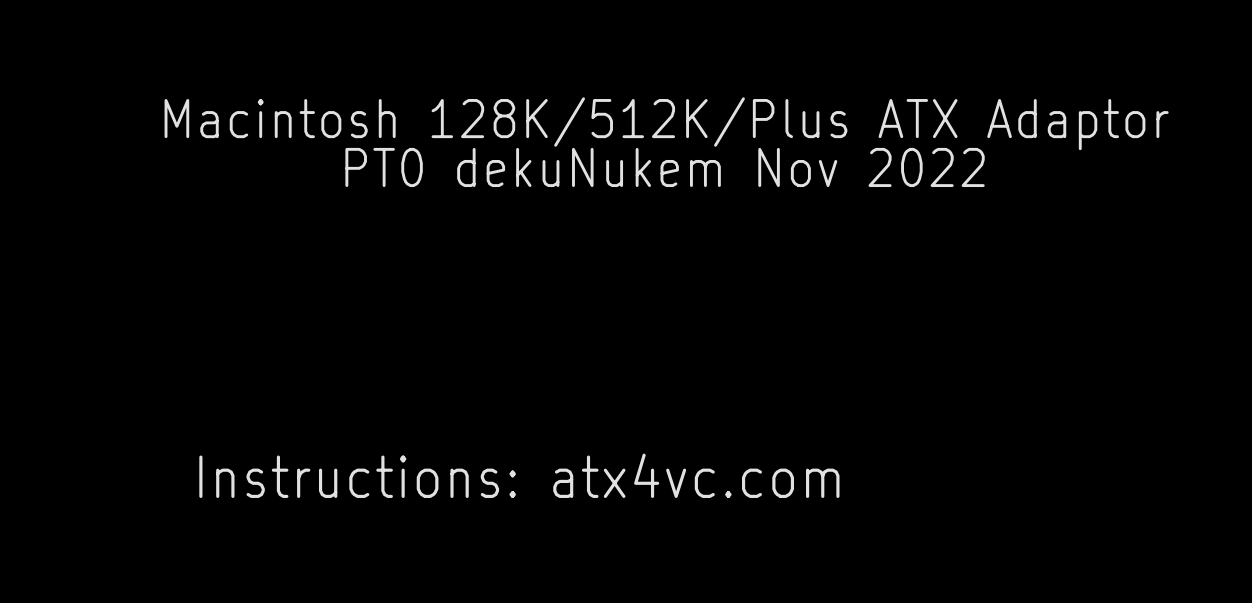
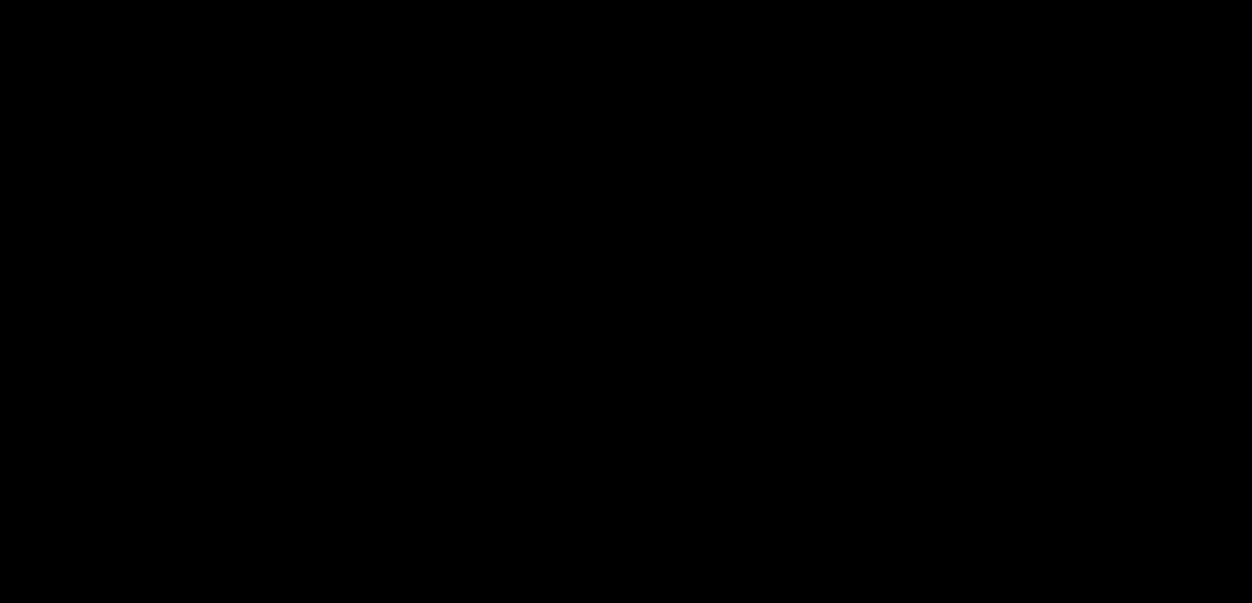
text: Macintosh 128K/512K/Plus ATX Adaptor (666, 123) -> none
text: PT0 dekuNukem Nov 2022 (665, 167) -> none
text: Instructions: atx4vc.com (519, 475) -> none

